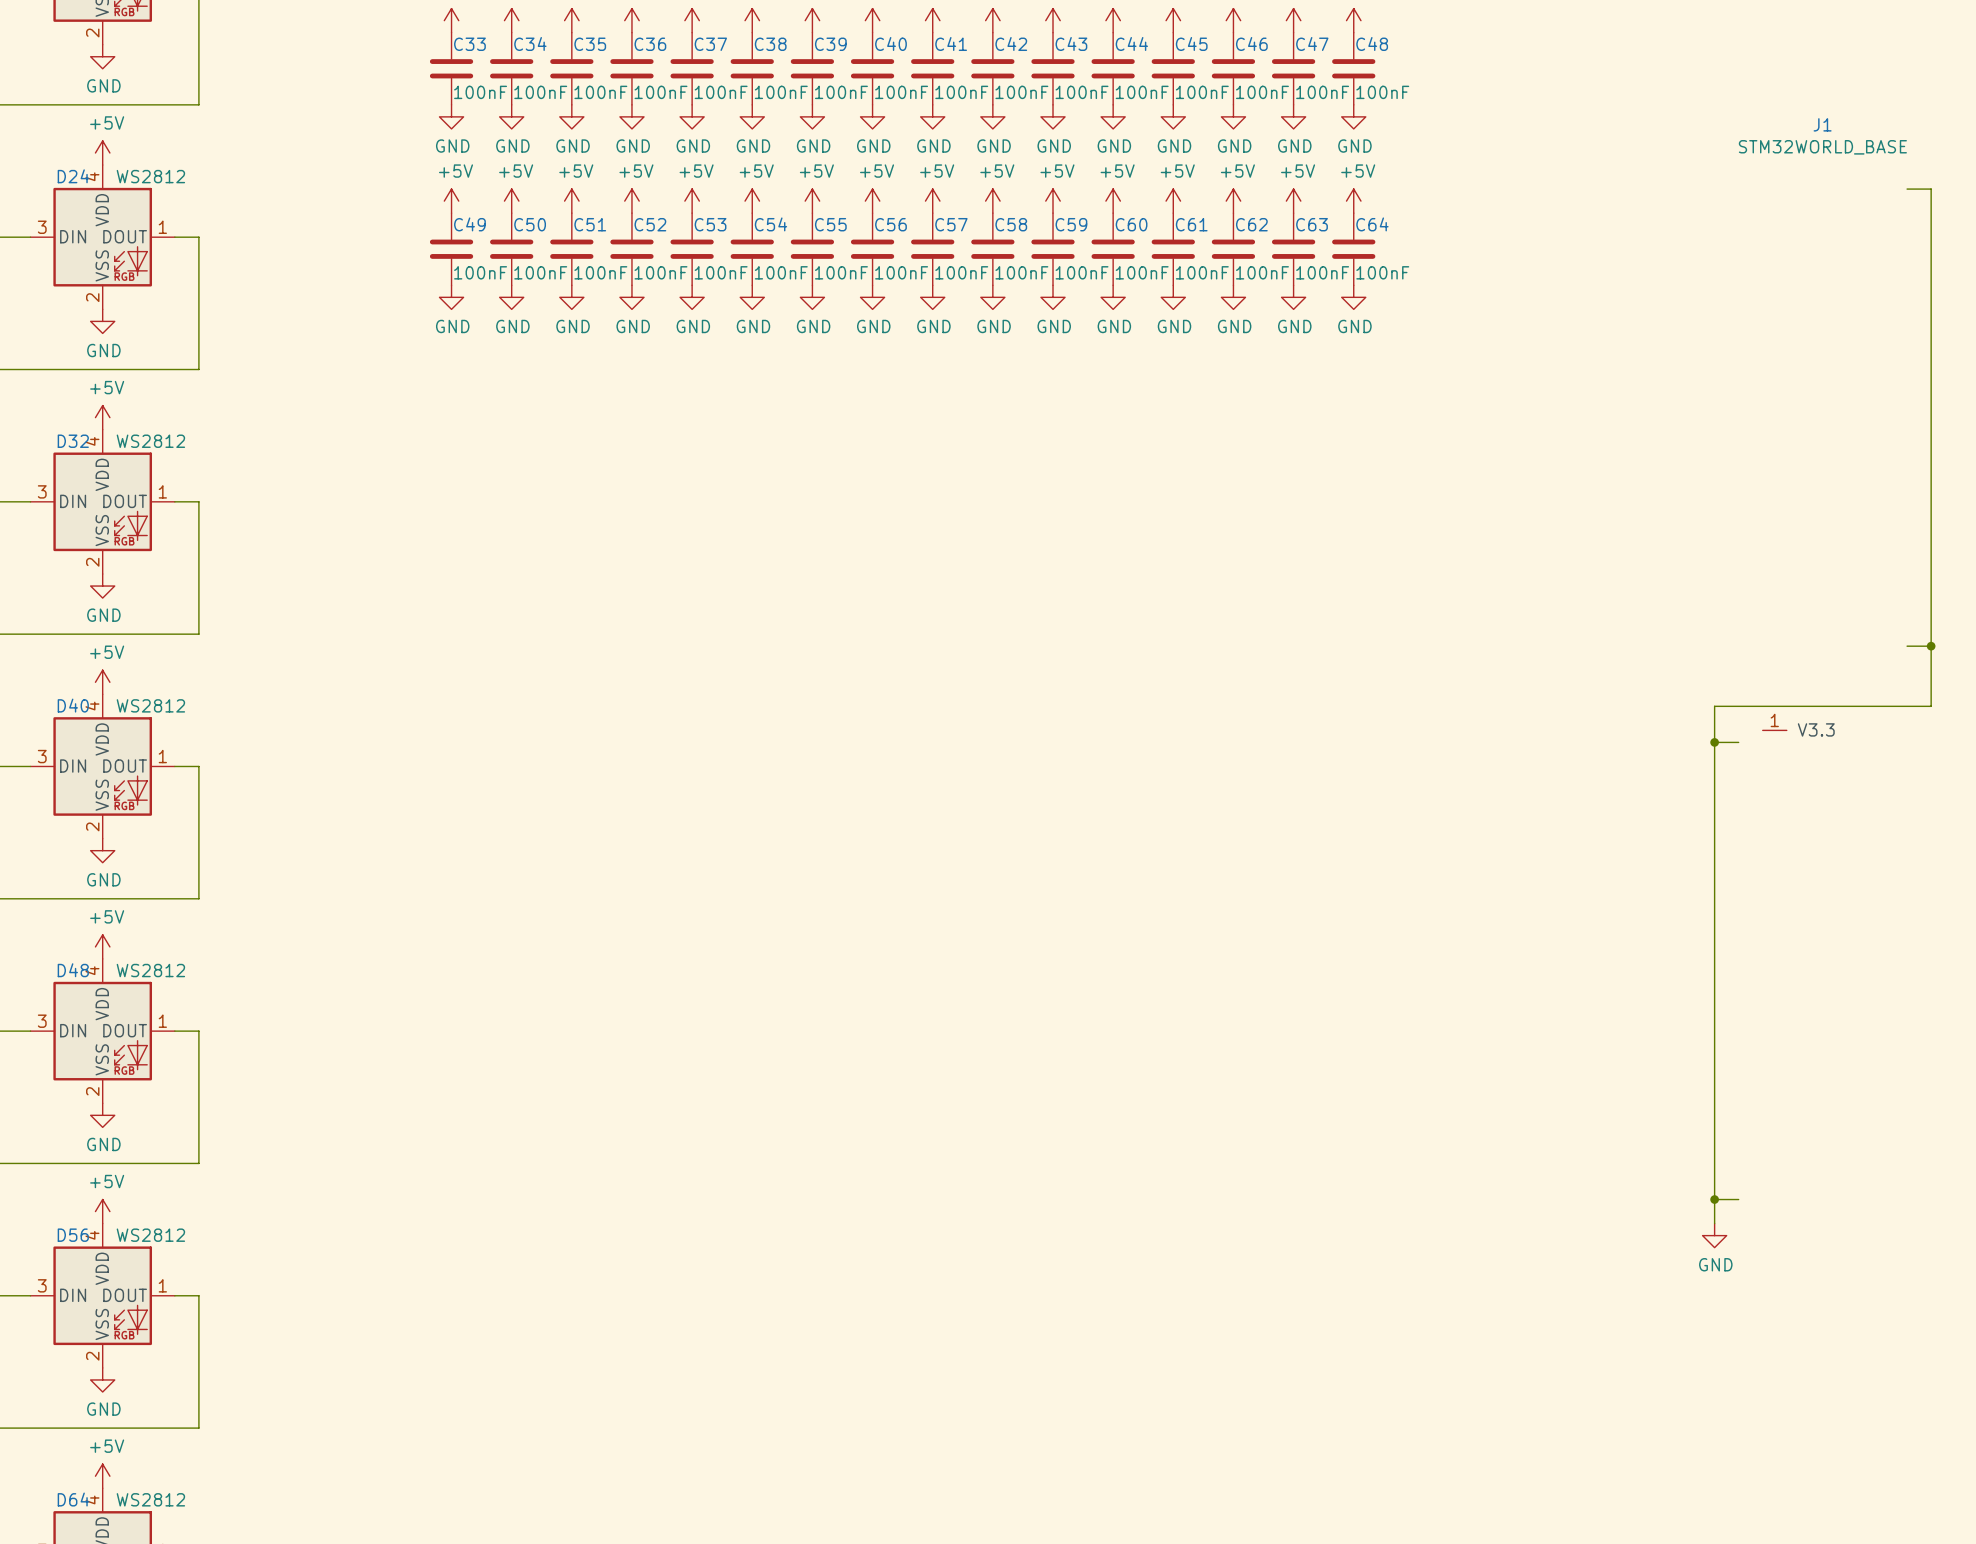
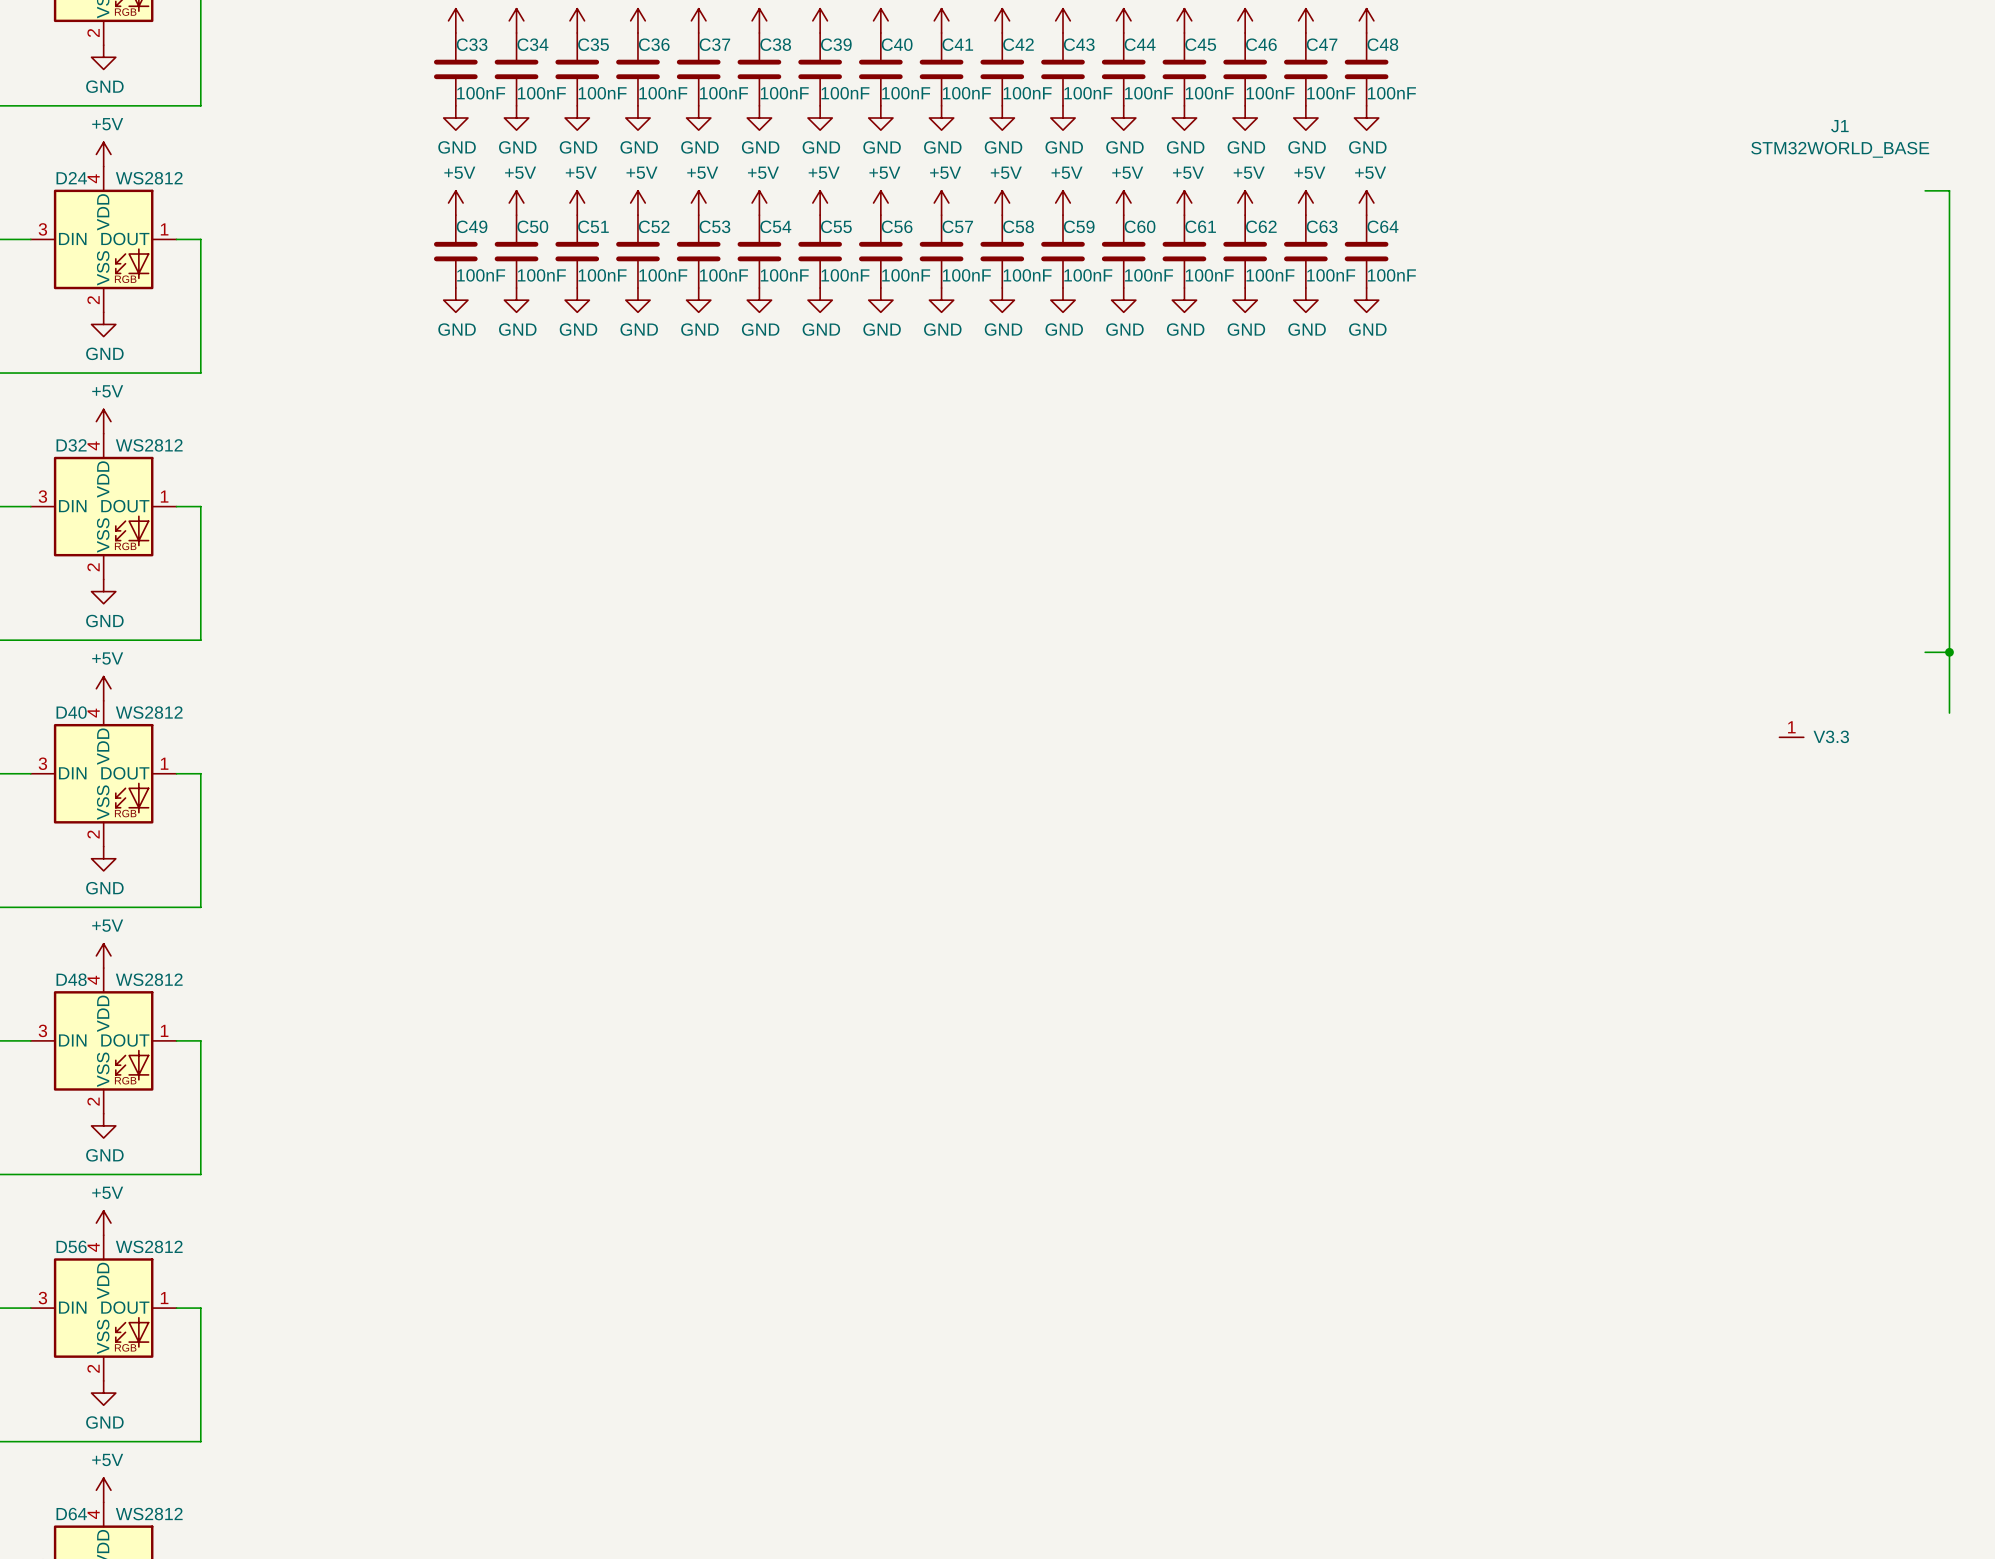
wire: (1931, 706) (1714, 706) (1714, 1223) -> none
wire: (1714, 742) (1738, 742) -> none
junction: (1714, 742) -> none
wire: (1714, 1199) (1738, 1199) -> none
junction: (1714, 1199) -> none
power symbol: GND (1714, 1235) -> none

